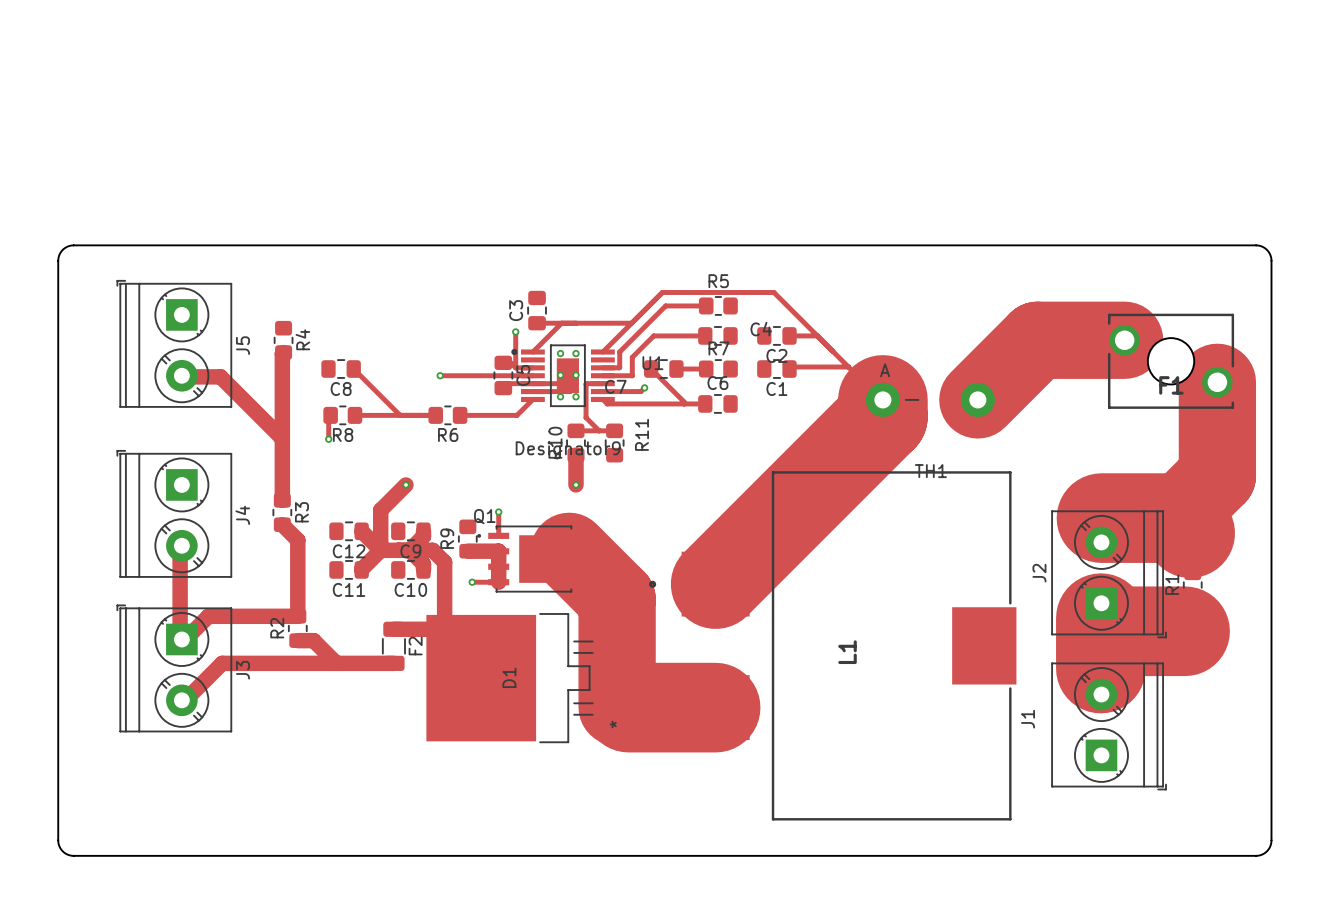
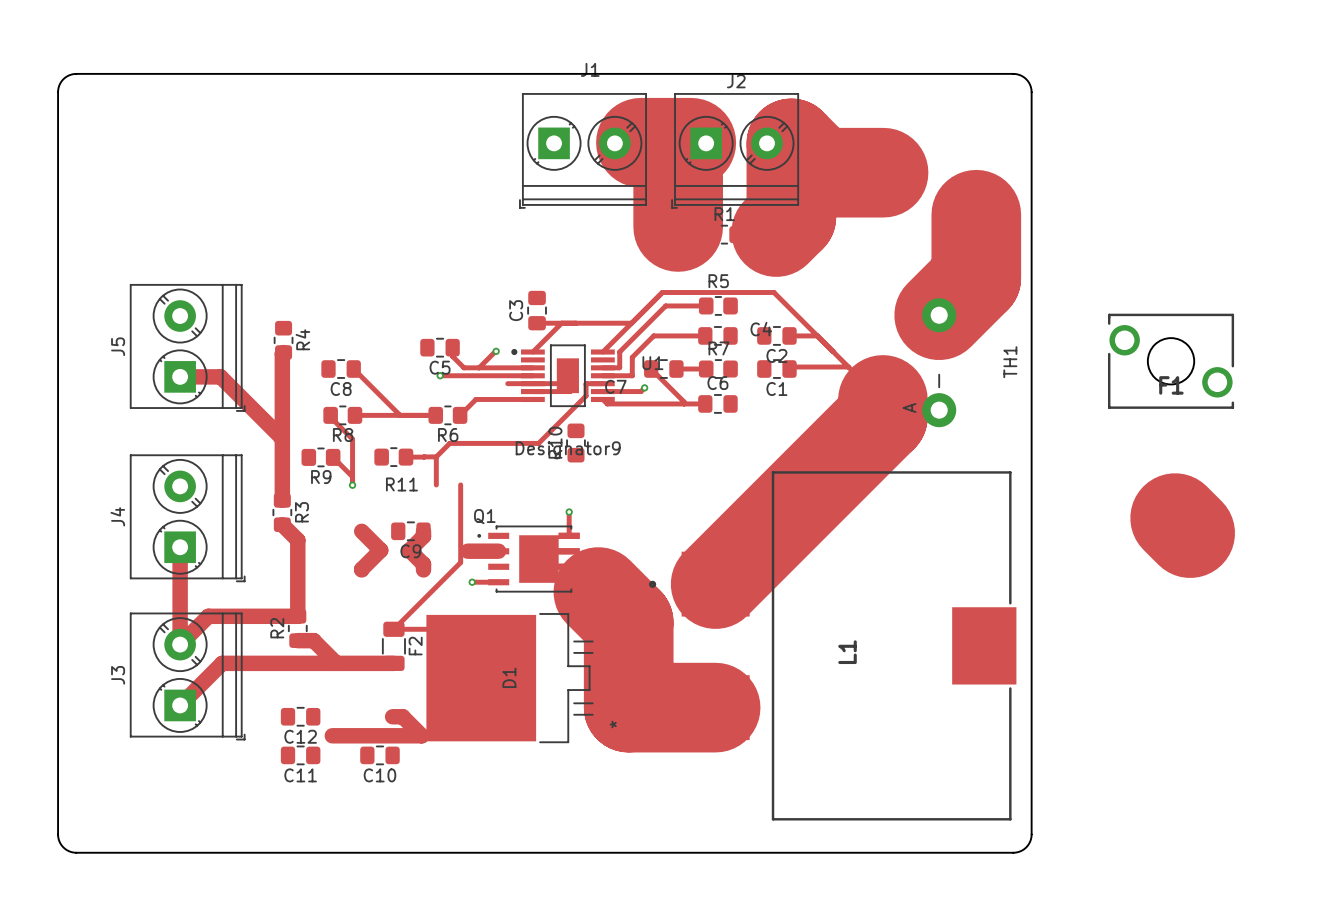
track: none -> (640, 142) (691, 142)
track: none -> (883, 172) (820, 172) (791, 143) (791, 217) (776, 232)
track: none -> (678, 176) (678, 226)
track: none -> (976, 214) (976, 278) (939, 315)
board edge: (73, 245) (1256, 245) (1262, 246) (1269, 252) (1271, 260) (1271, 840) (1269, 847) (1264, 853) (1256, 855) (73, 855) (66, 854) (60, 848) (58, 840) (58, 260) (62, 249) (73, 245) -> (76, 73) (63, 79) (58, 92) (58, 834) (59, 841) (65, 848) (76, 852) (1013, 852) (1020, 851) (1027, 845) (1031, 834) (1031, 92) (1029, 83) (1024, 77) (1013, 73) (76, 73)
track: (515, 331) (515, 367) (510, 362) (503, 362) -> none
via position: (515, 331) -> (496, 351)
track: (1124, 340) (1037, 340) (977, 399) -> none
J5 rotation: 0° (174, 343) -> 180° (187, 347)
track: none -> (452, 347) (452, 356) (463, 367) (515, 367)
track: none -> (496, 351) (479, 367)
via: (560, 353) -> none
via: (575, 353) -> none
C5 rotation: 0° (503, 375) -> 90° clockwise (440, 347)
C5 position: (503, 375) -> (440, 347)
via: (560, 375) -> none
via: (575, 375) -> none
track: (1217, 382) (1217, 475) (1175, 518) (1101, 518) -> none
track: (586, 395) (586, 417) (599, 430) -> (586, 395) (538, 443) (449, 443) (436, 456)
via: (560, 396) -> none
via: (575, 396) -> none
track: (532, 399) (517, 415) (460, 415) -> (532, 399) (475, 399) (460, 415)
TH1 rotation: 0° (930, 399) -> 90° counterclockwise (939, 362)
track: none -> (330, 417) (352, 439) (352, 485)
track: (328, 419) (328, 439) -> none
track: (575, 430) (614, 430) -> none
via: (328, 439) -> none
R11 rotation: 0° (614, 443) -> 90° clockwise (393, 457)
R11 position: (614, 443) -> (393, 457)
track: (575, 455) (575, 484) -> none
track: none -> (436, 456) (436, 484)
track: none -> (436, 456) (405, 457)
track: none -> (333, 457) (352, 476)
track: (405, 484) (380, 510) (380, 550) (432, 550) (444, 562) (444, 641) -> none
via: (405, 484) -> none
track: none -> (460, 484) (460, 562) (393, 629)
via position: (575, 484) -> (569, 512)
via: none -> (352, 485)
track: (498, 512) (498, 535) -> (569, 512) (569, 535)
via: (498, 512) -> none
J4 rotation: 0° (174, 513) -> 180° (187, 518)
C12 position: (349, 531) -> (300, 716)
R9 name position: R9 (447, 538) -> R9 (321, 477)
R9 rotation: 0° (467, 539) -> 90° clockwise (320, 457)
R9 position: (467, 539) -> (320, 457)
track: (498, 551) (498, 582) -> none
track: (569, 551) (617, 599) (617, 707) -> none
C11 position: (349, 569) -> (300, 755)
C10 position: (410, 569) -> (379, 755)
J2 rotation: 0° (1109, 574) -> 90° clockwise (735, 150)
J2 position: (1109, 574) -> (735, 150)
R1 rotation: 0° (1192, 585) -> 90° clockwise (724, 234)
R1 position: (1192, 585) -> (724, 234)
track: none -> (598, 592) (628, 622) (628, 707)
track: (1100, 618) (1100, 668) -> none
track width: thick (393, 629) (432, 629) -> thin (393, 629) (432, 629)
track: (1134, 631) (1185, 631) -> none
J3 rotation: 0° (174, 668) -> 180° (187, 676)
track: none -> (392, 716) (402, 716) (421, 735) (332, 735)
J1 rotation: 0° (1109, 726) -> 90° clockwise (583, 150)
J1 position: (1109, 726) -> (583, 150)

